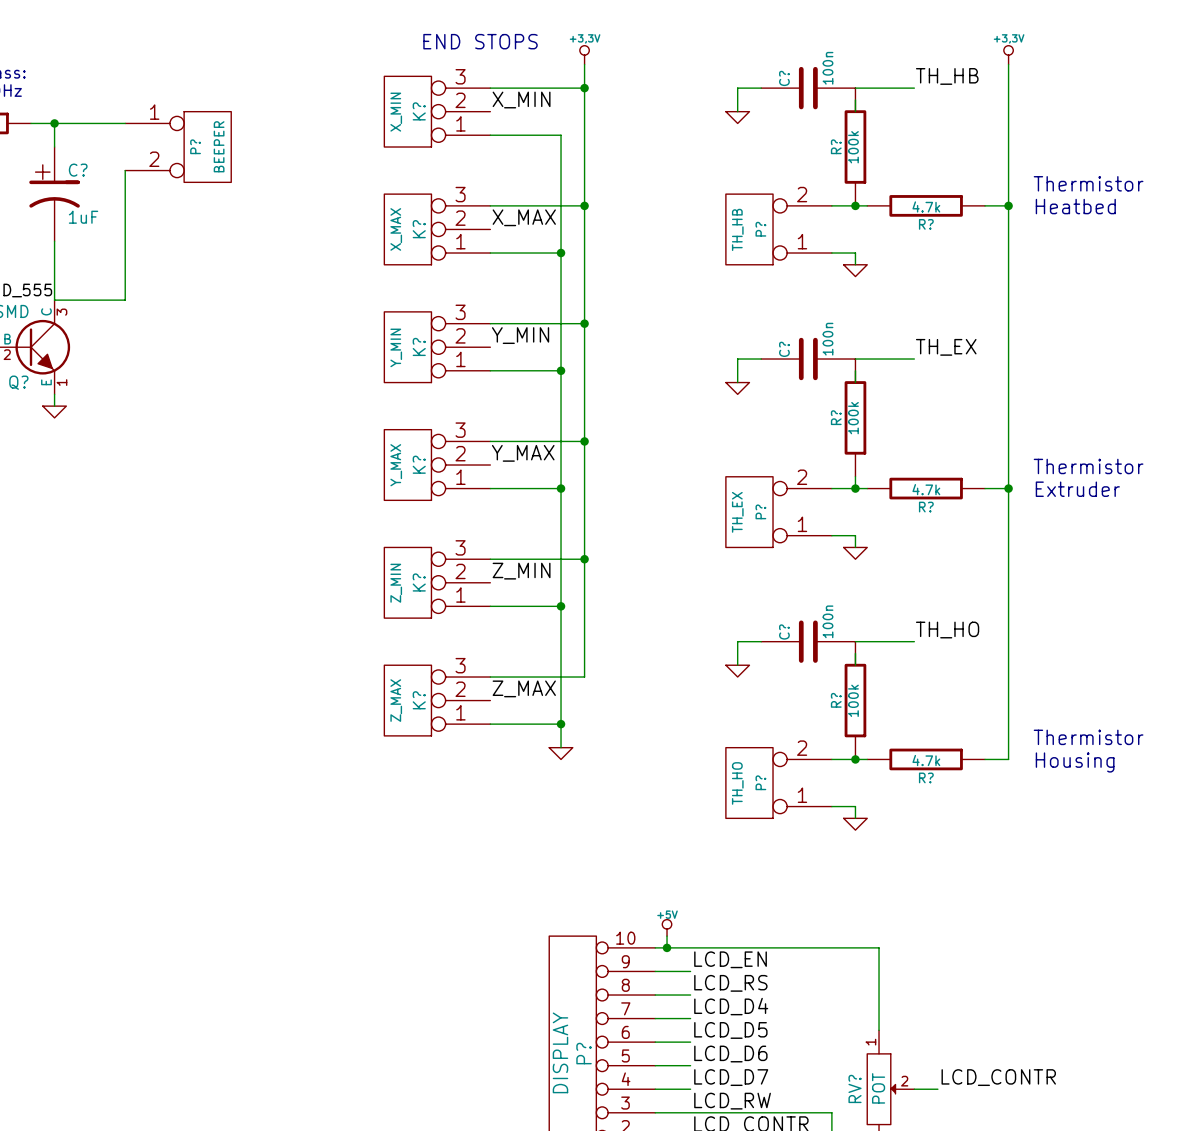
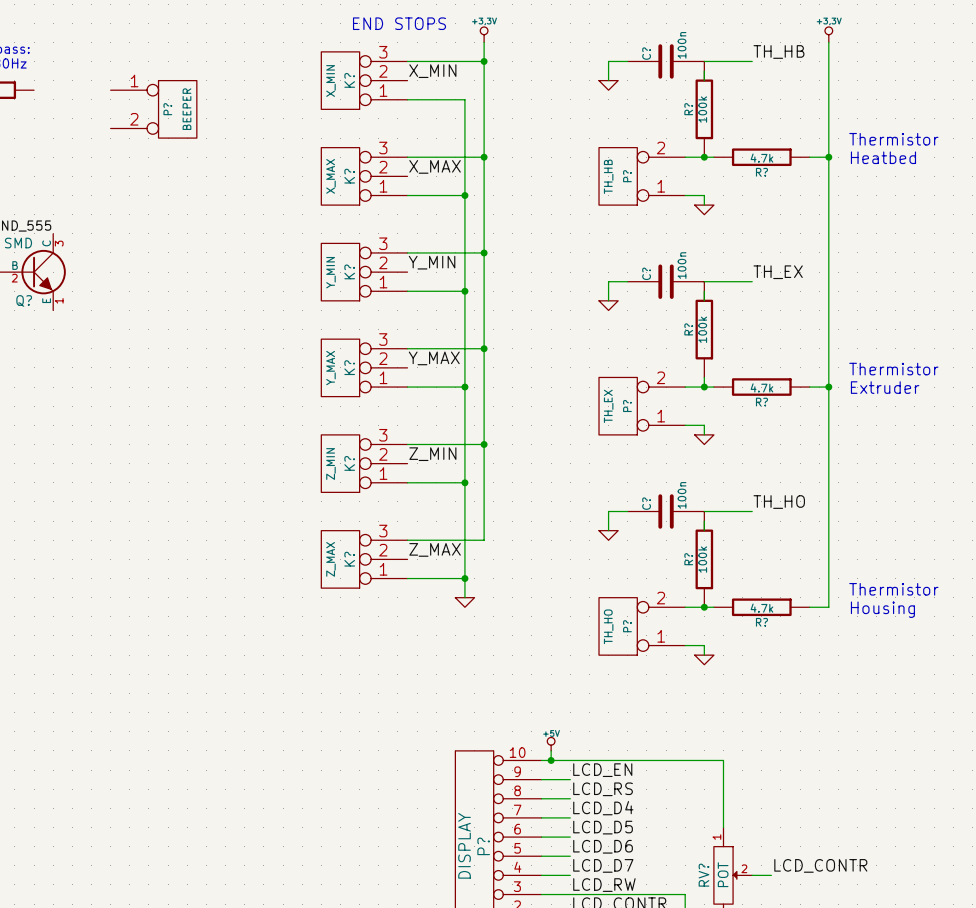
wire: (31, 123) (125, 123) -> none
wire: (54, 123) (54, 147) -> none
junction: (54, 123) -> none
wire: (125, 170) (125, 300) (54, 300) (54, 241) -> none
C?: 1uF (54, 194) -> none
wire: (54, 394) (54, 406) -> none
power symbol: (54, 412) -> none

